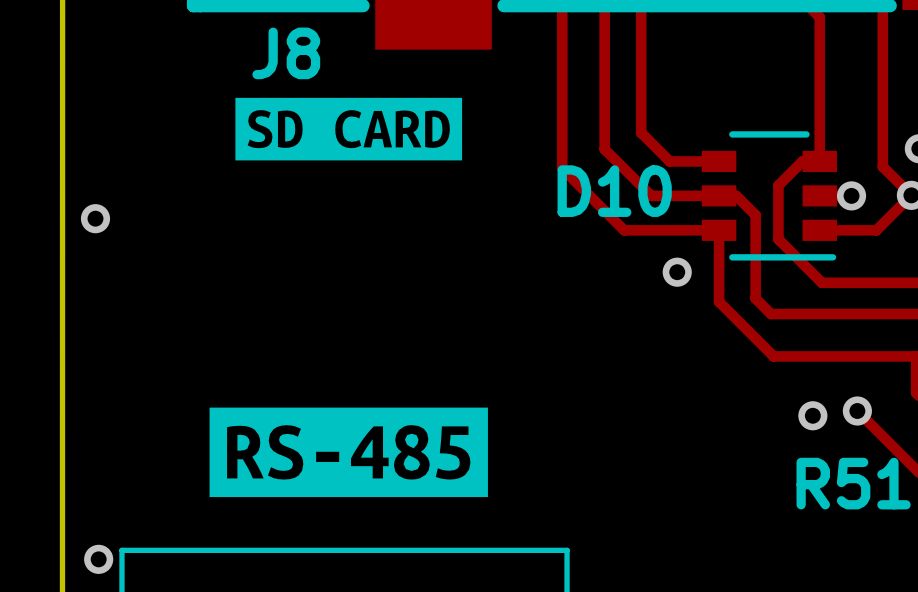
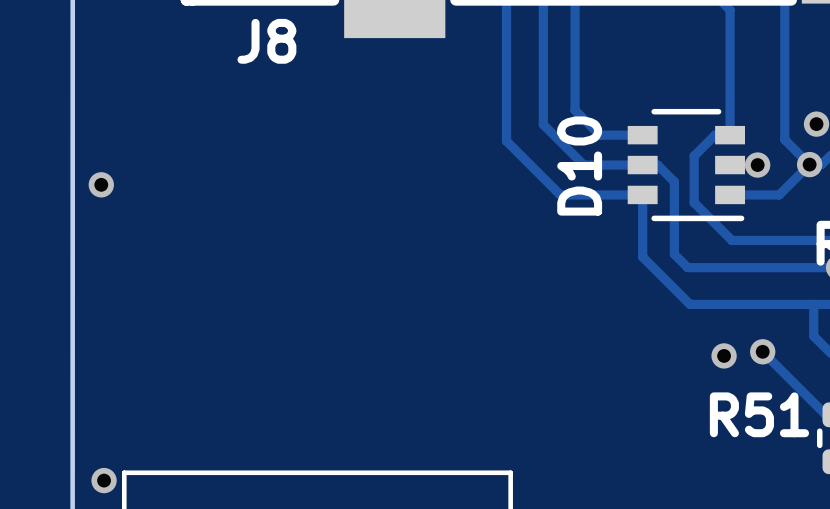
drawing: [235, 97, 463, 161] -> none
D10 name rotation: 0° (614, 191) -> 90° counterclockwise (579, 166)
via: (677, 272) -> none
drawing: [209, 407, 488, 498] -> none

